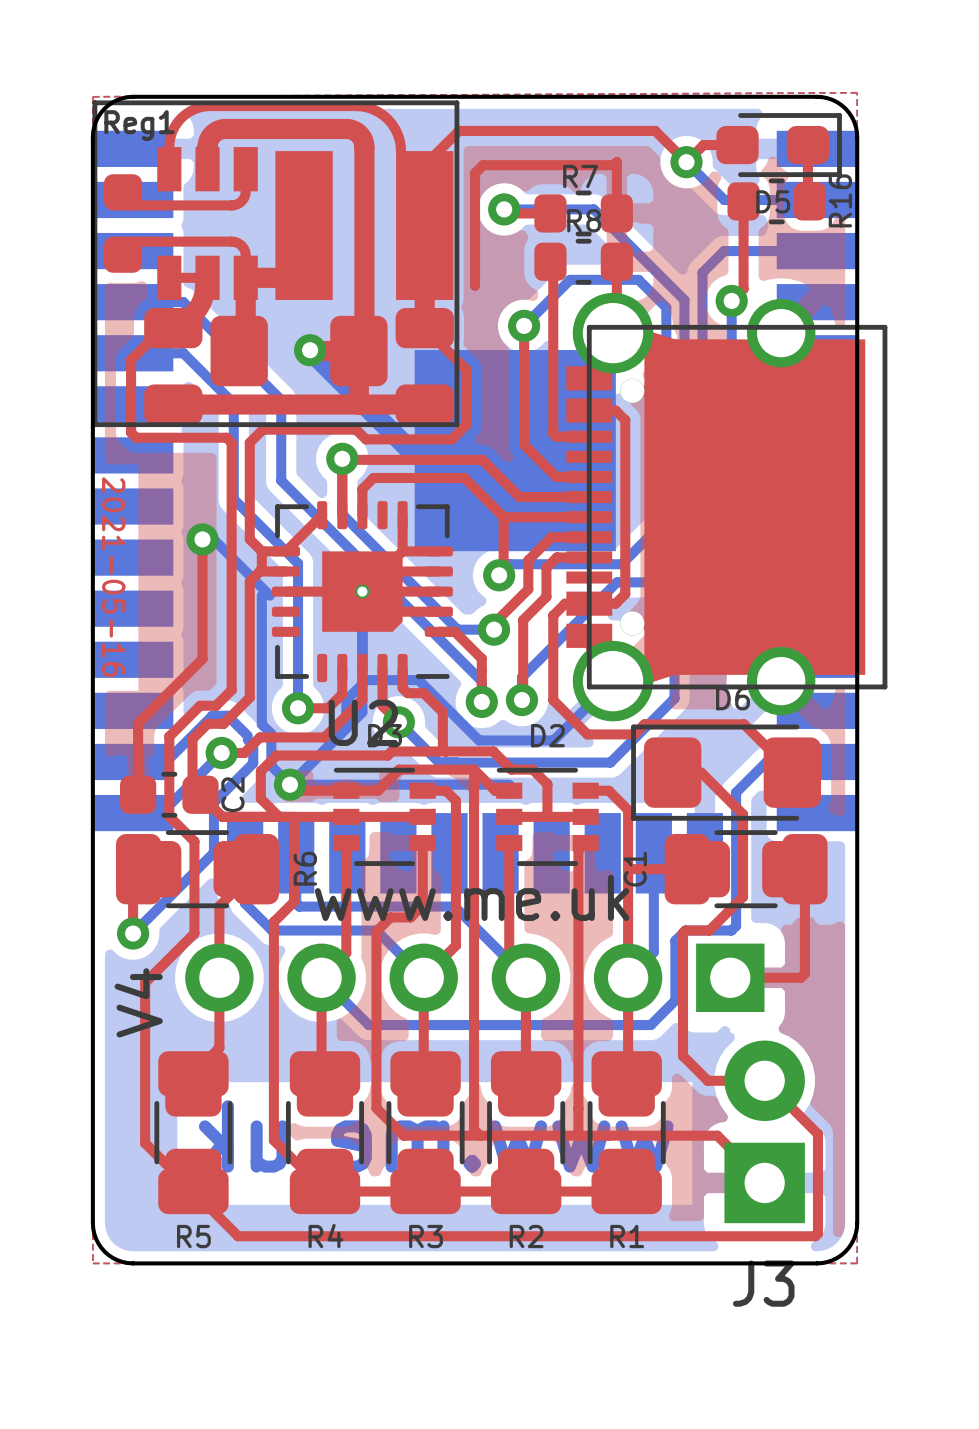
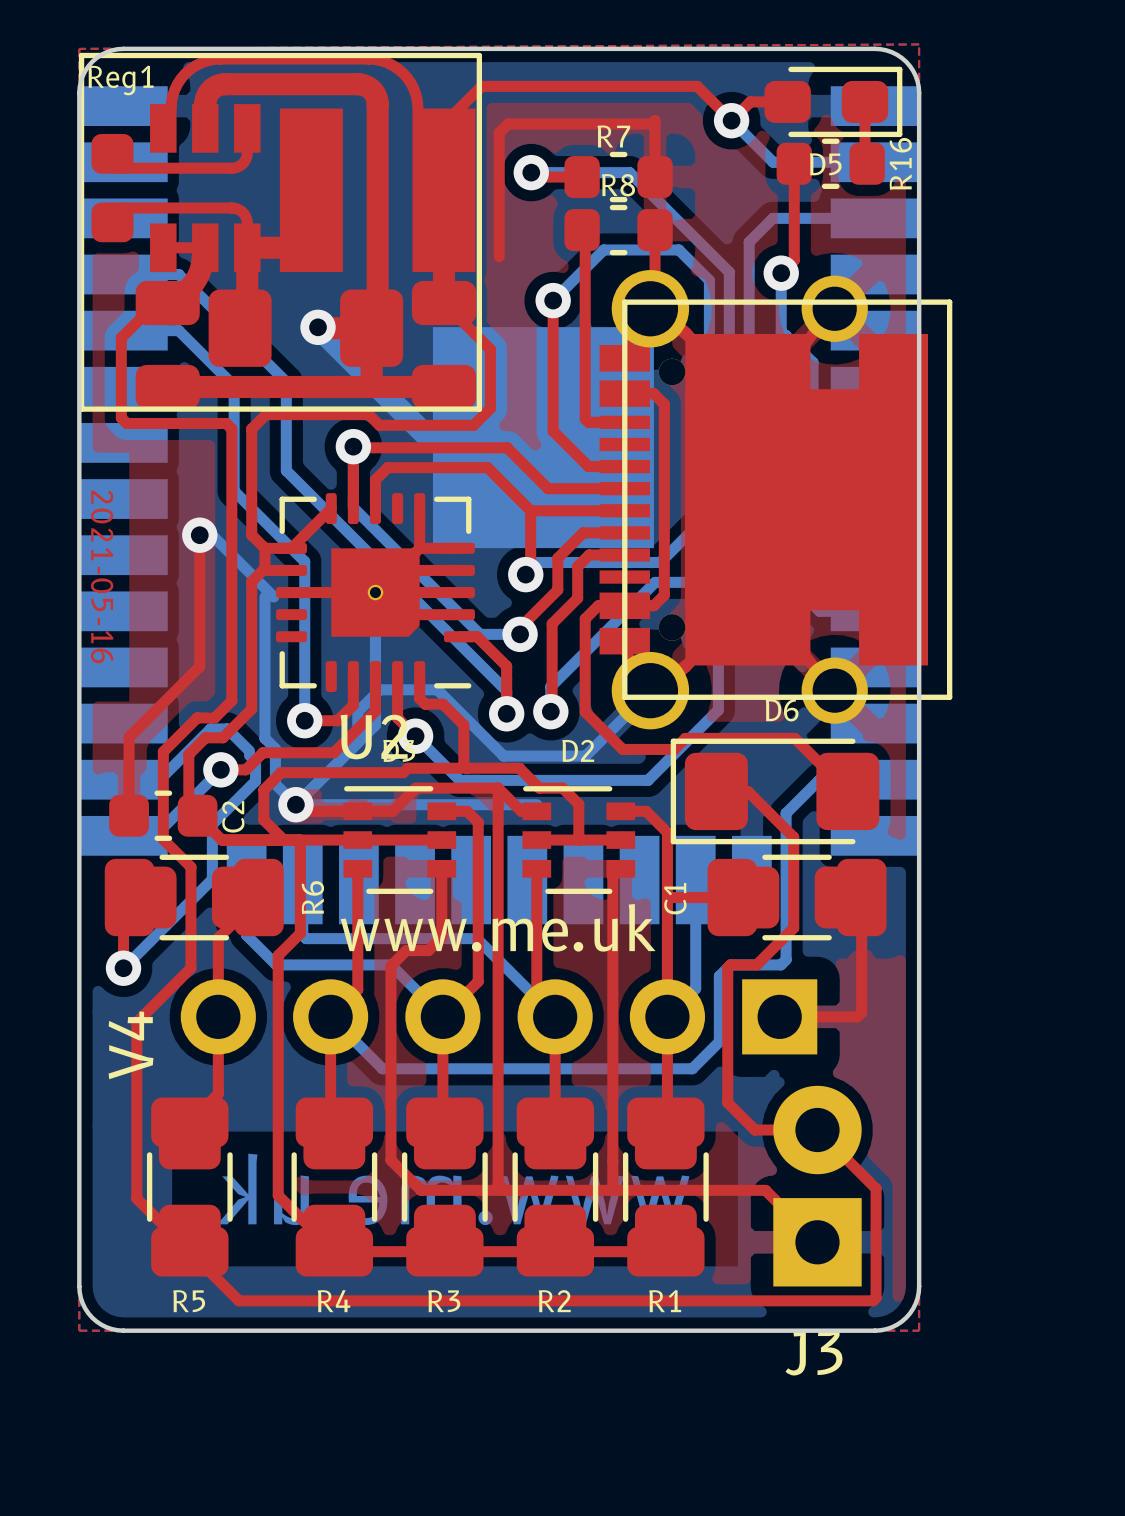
Reg1 footprint: [92, 100, 460, 428] -> [78, 52, 483, 412]
part footprint: [566, 292, 888, 722] -> [599, 270, 953, 730]

